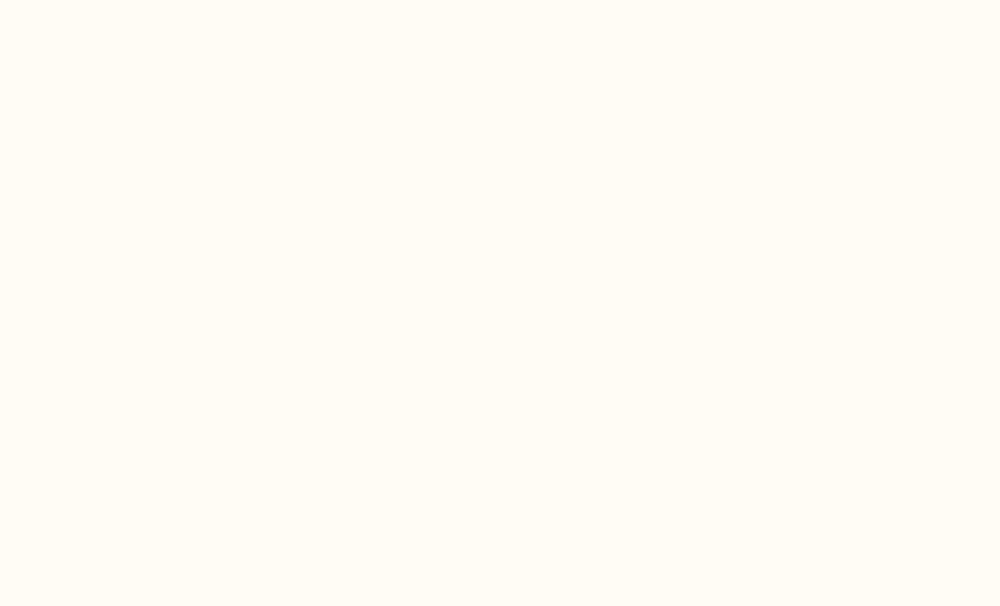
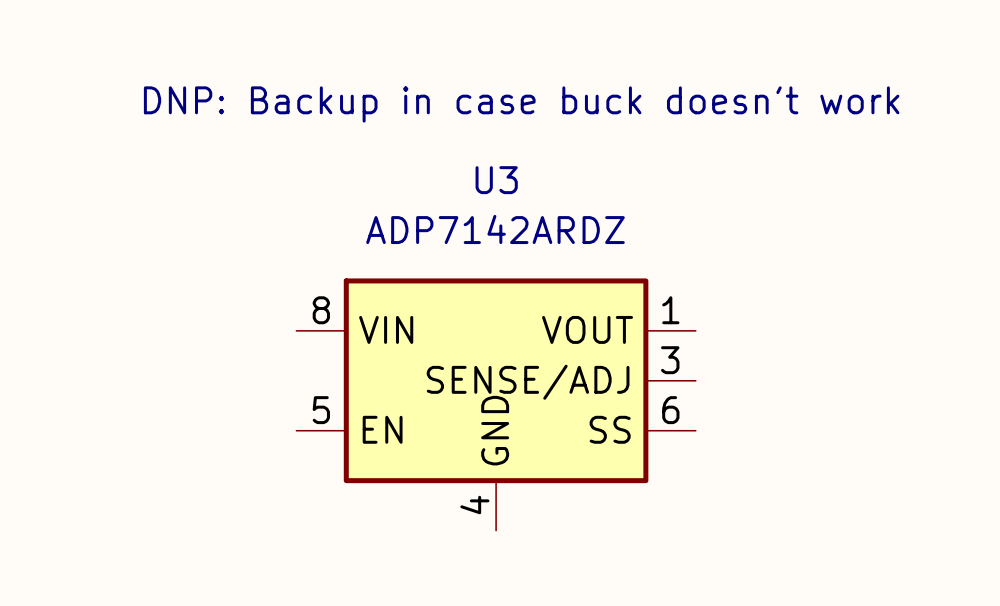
text: none -> DNP: Backup in case buck doesn't work (521, 104)
U3: none -> ADP7142ARDZ (496, 404)

